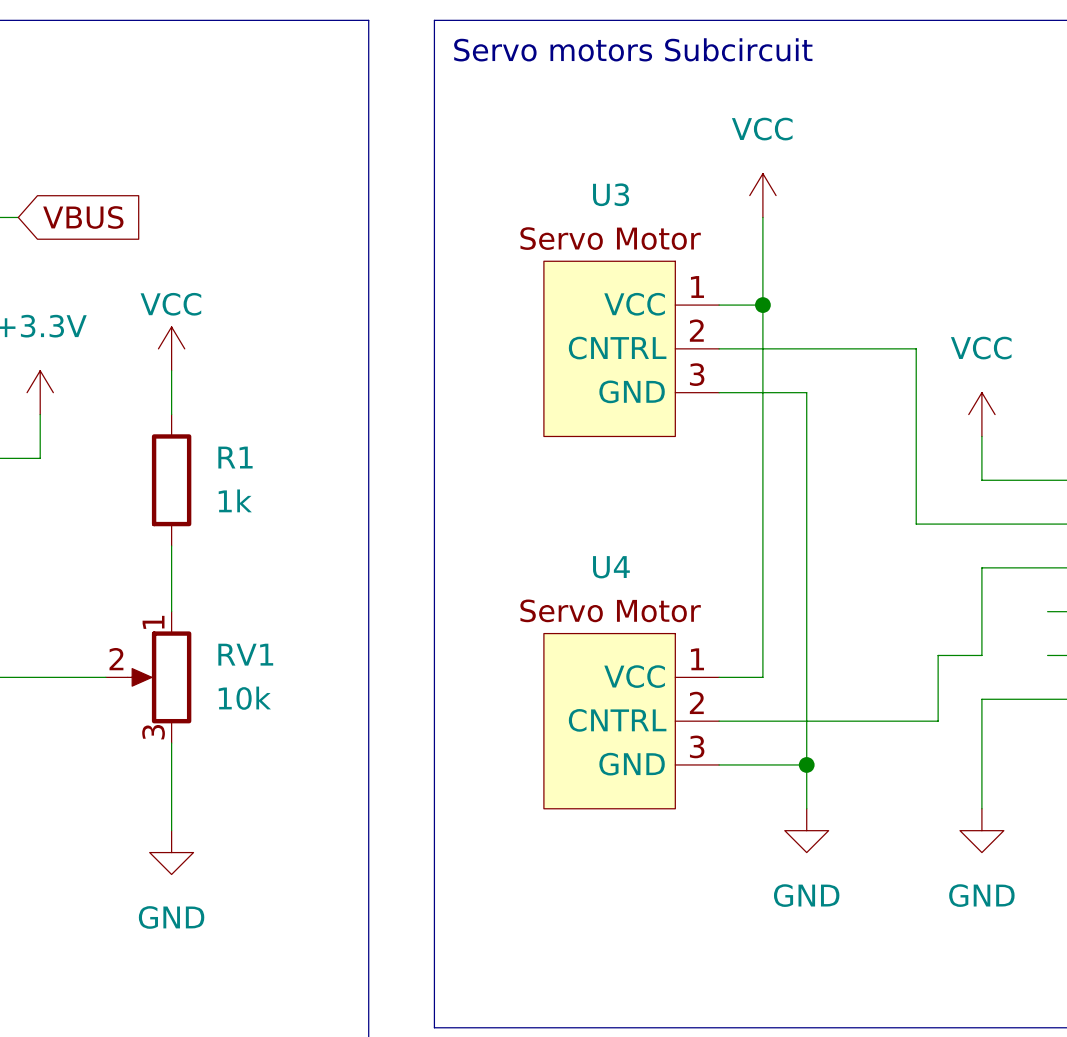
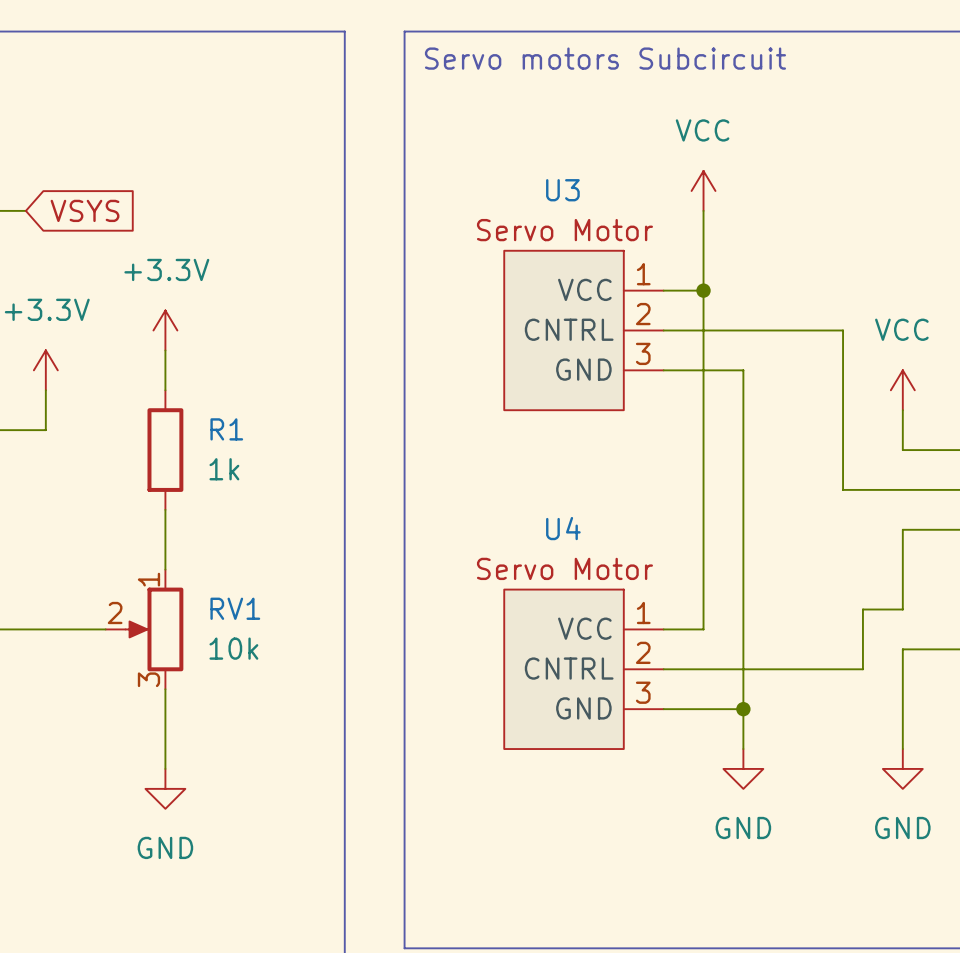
global label: VBUS (83, 217) -> VSYS (85, 210)
power symbol: VCC (171, 348) -> +3.3V (165, 330)

